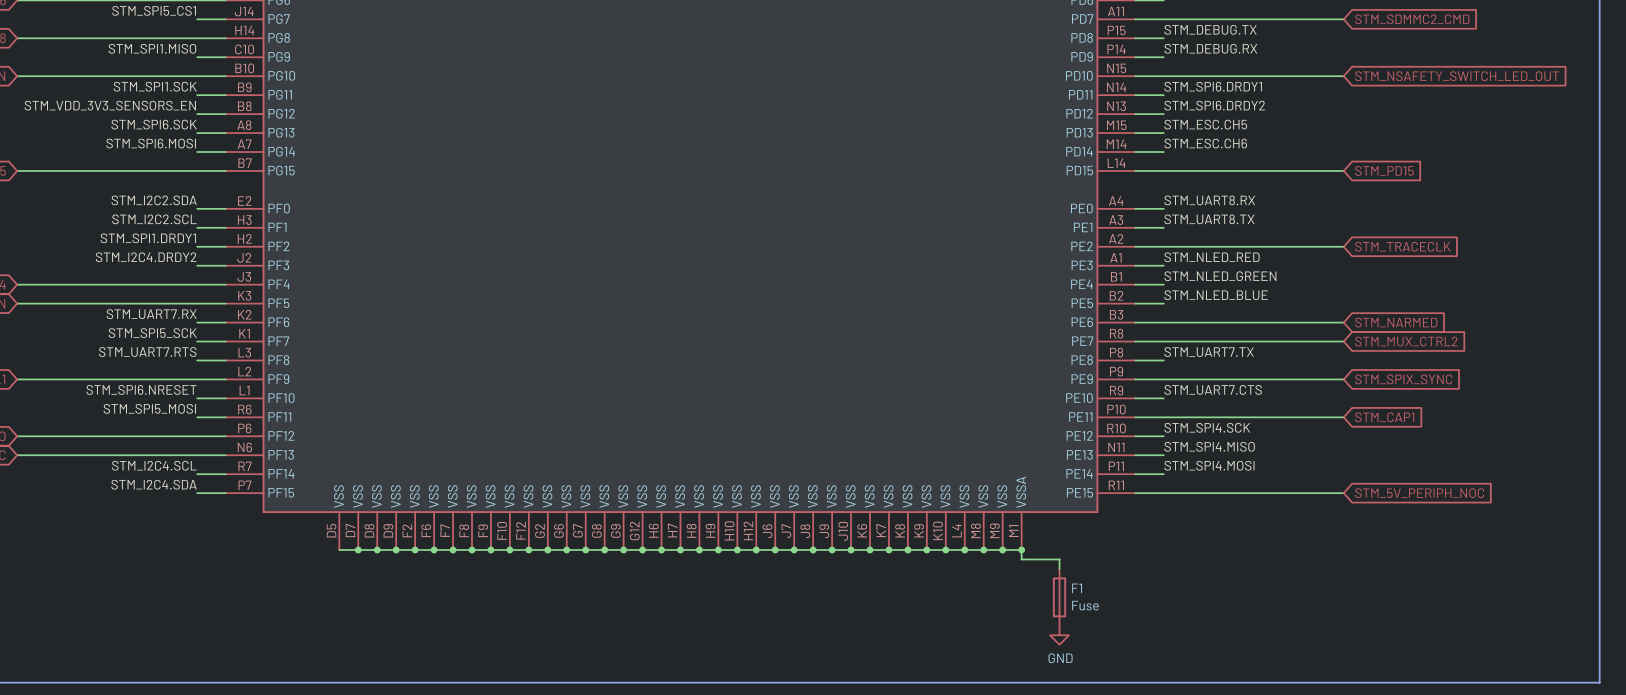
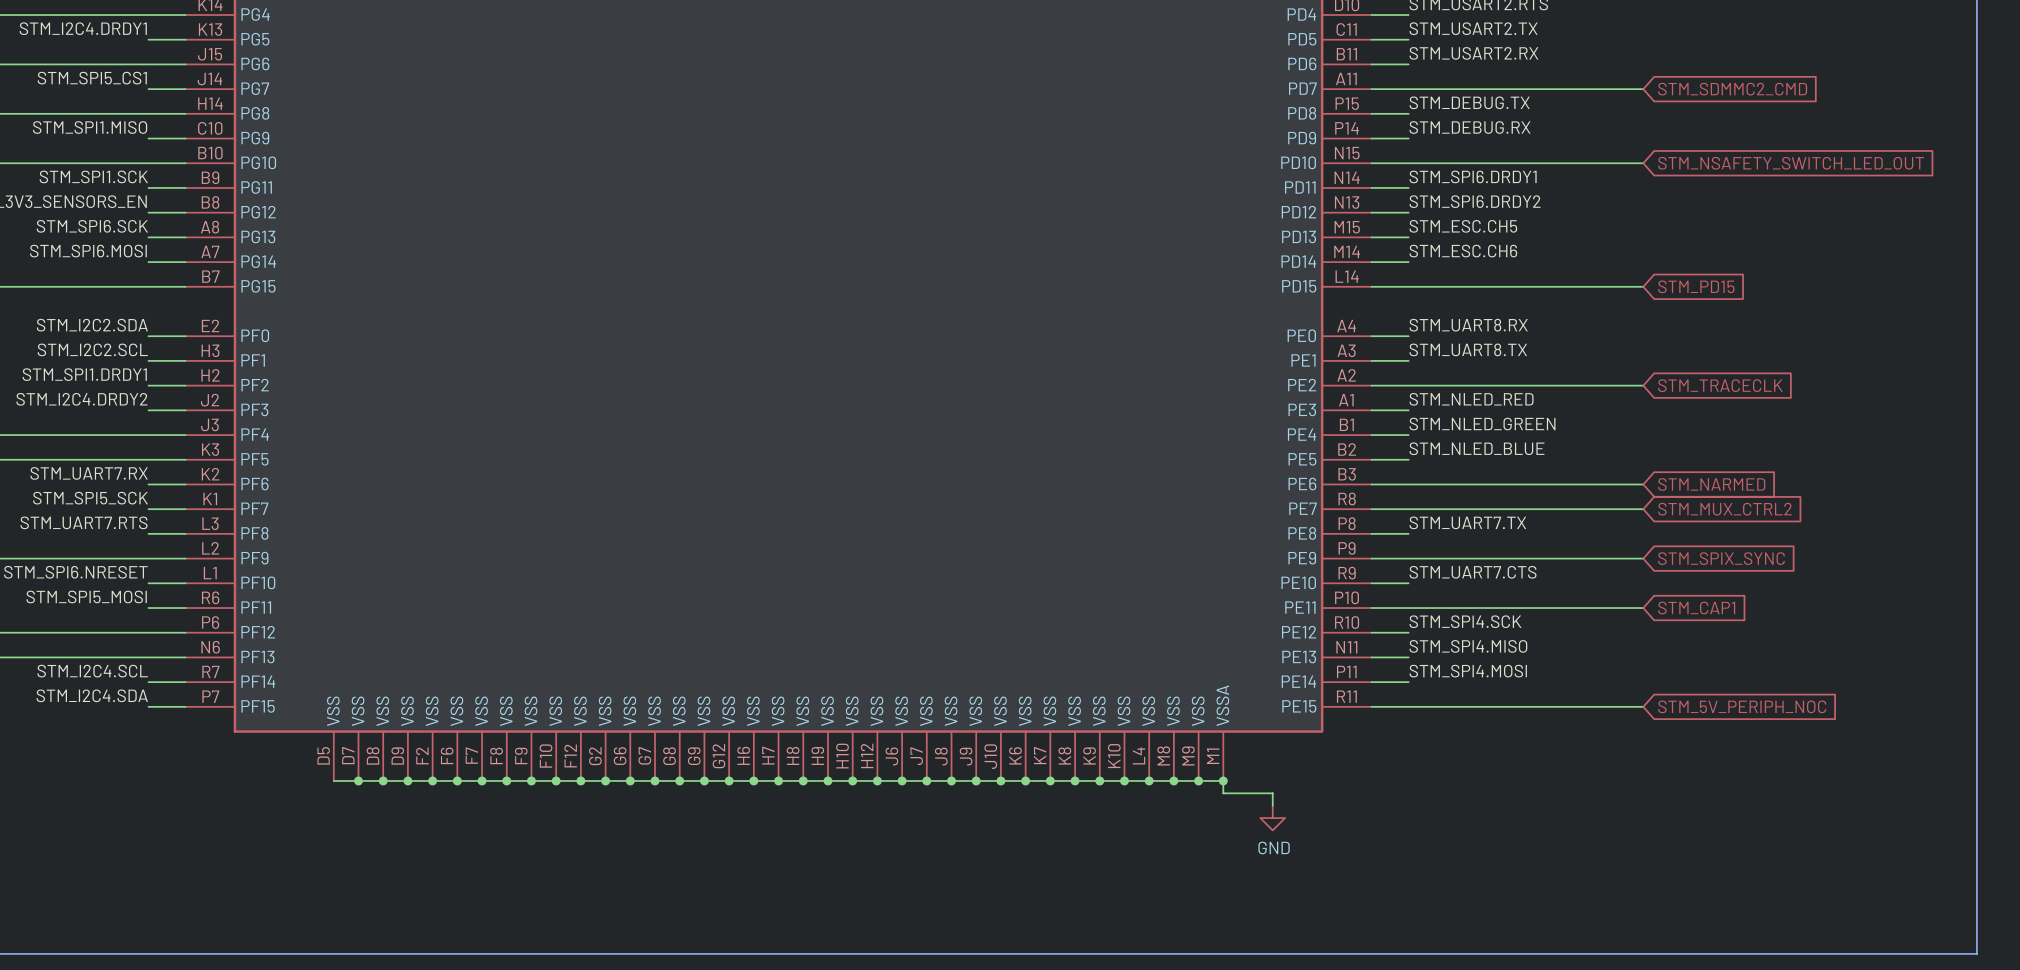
F1: Fuse (1059, 597) -> none
power symbol position: GND (1059, 635) -> GND (1272, 818)

